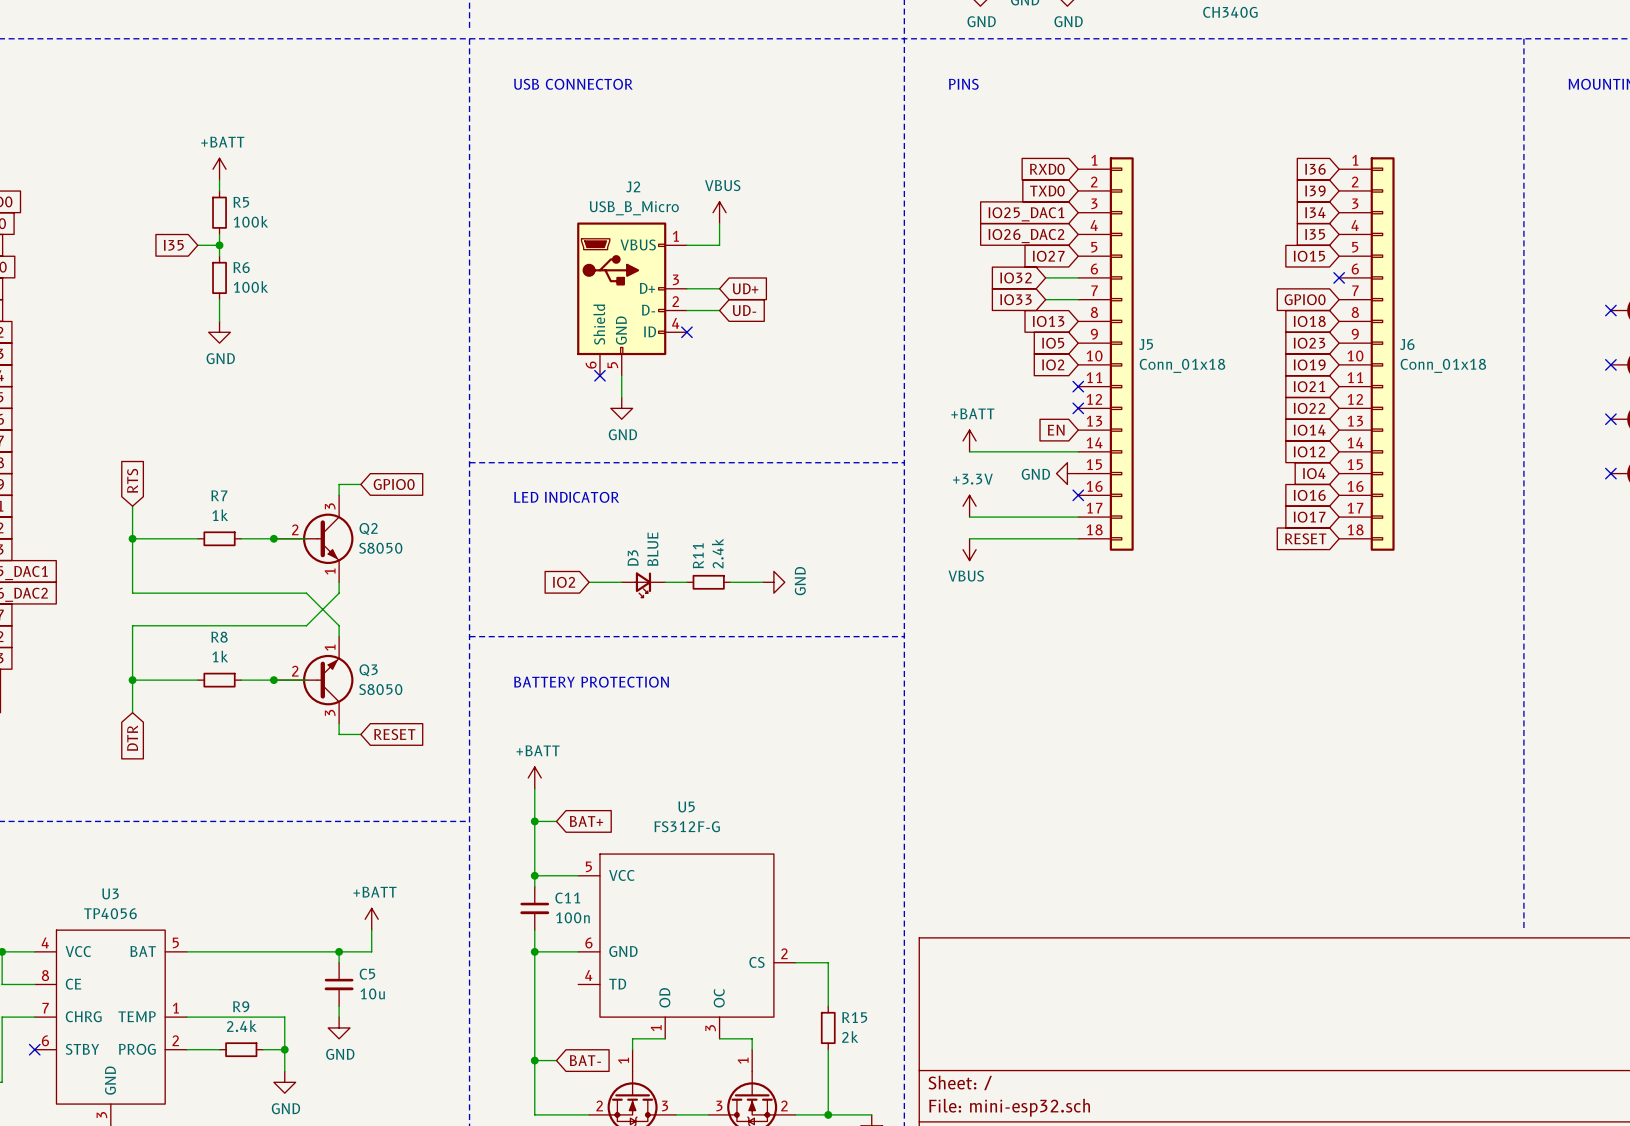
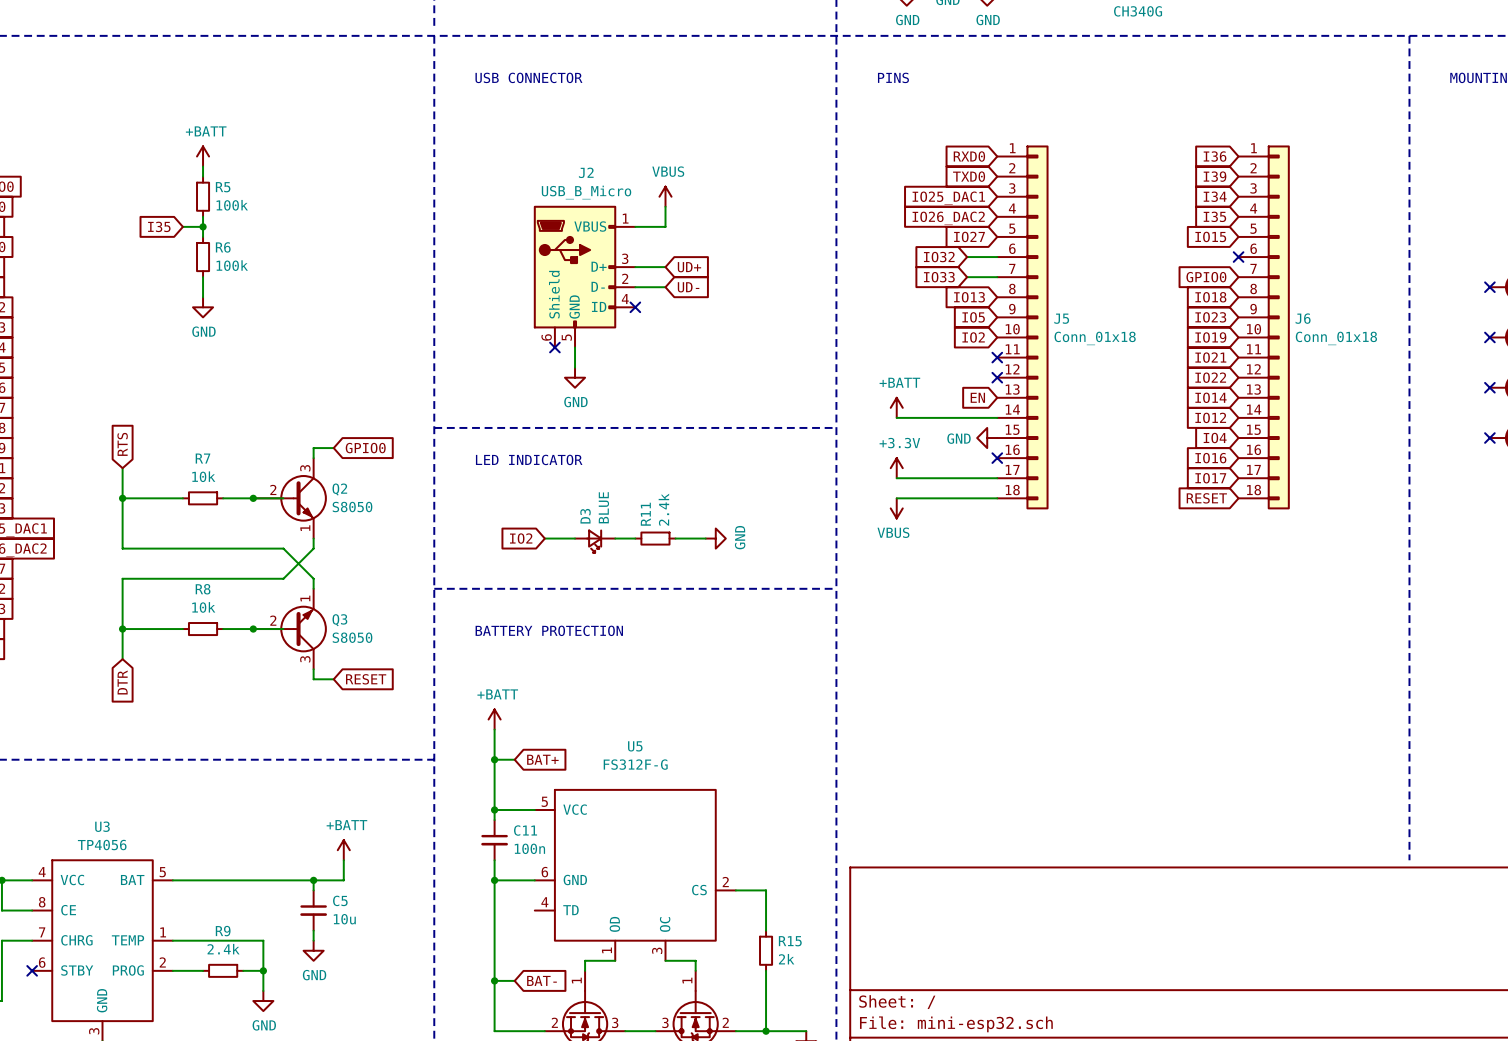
R7 value: 1k (220, 515) -> 10k (203, 476)
R8 value: 1k (220, 656) -> 10k (203, 607)

